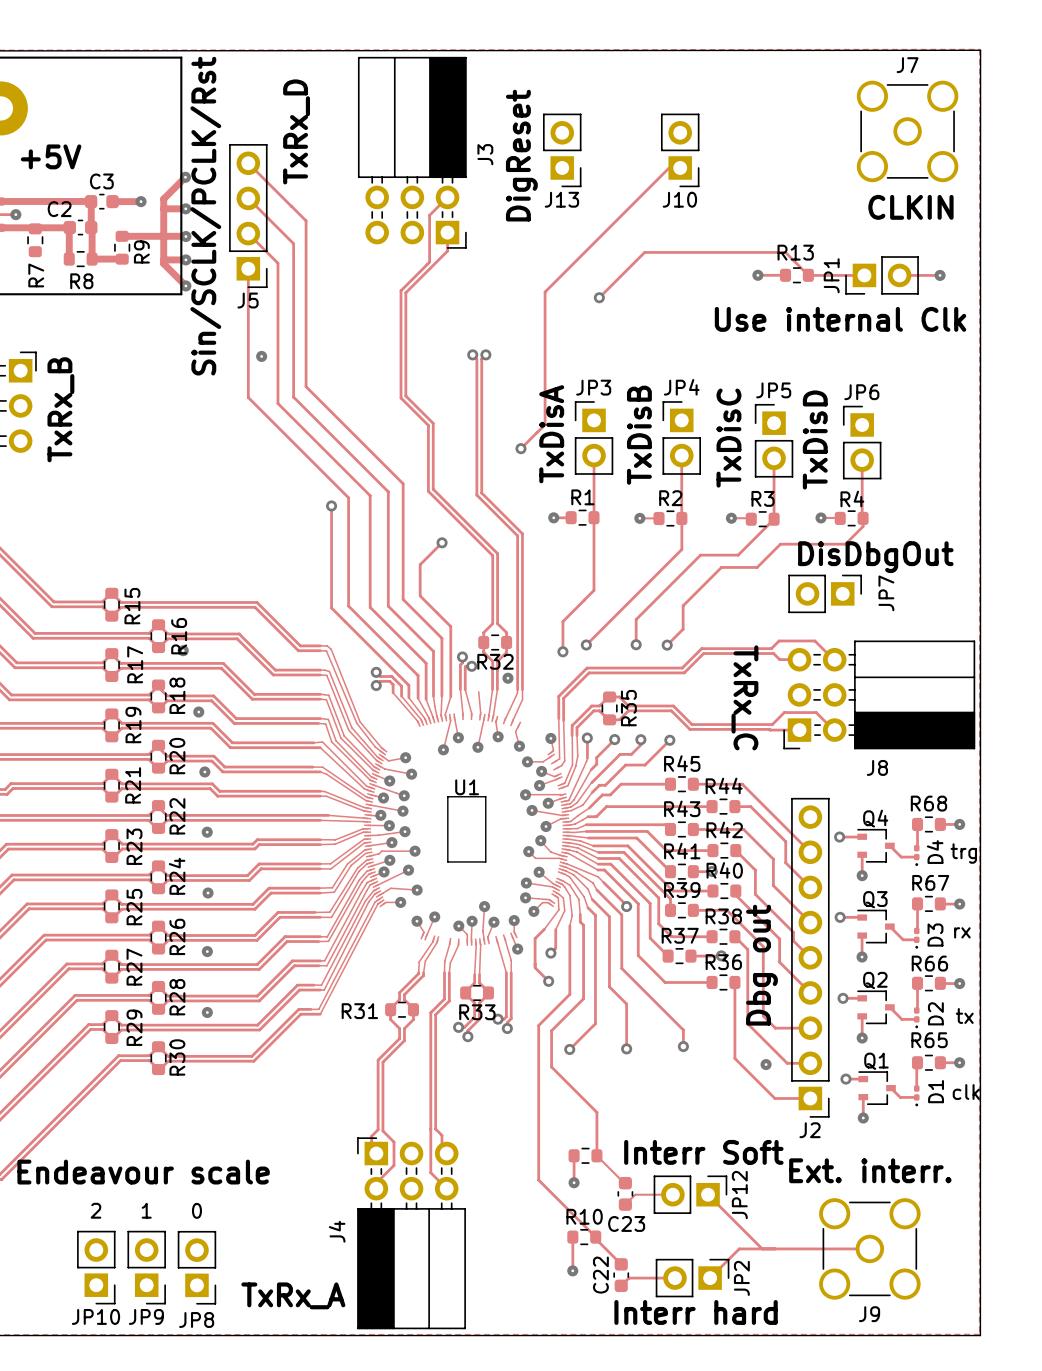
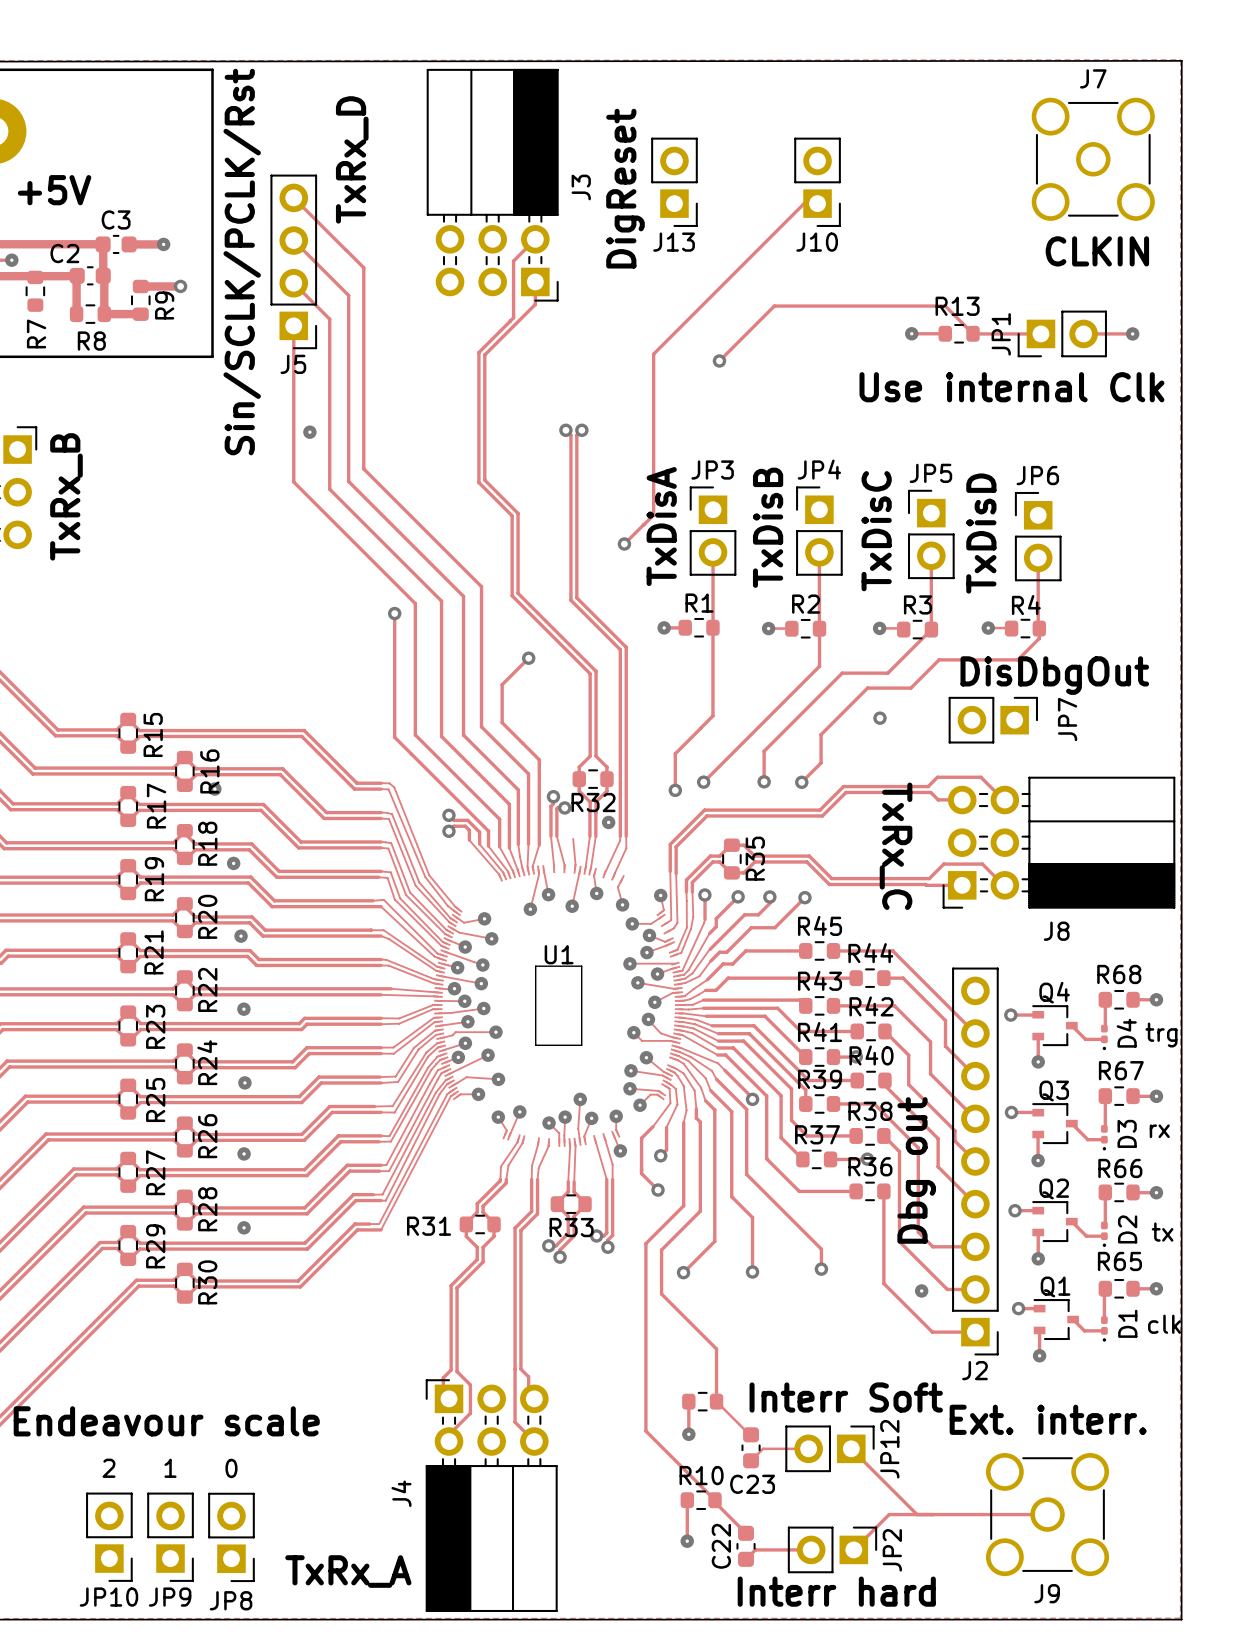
track: (185, 177) (163, 198) (163, 263) (185, 285) -> none
via: (185, 177) -> none
track: (163, 208) (185, 208) -> none
via: (185, 208) -> none
track: (154, 236) (185, 236) -> none
via: none -> (180, 286)
via: (185, 236) -> none
track: (163, 259) (185, 259) -> none
via: (185, 259) -> none
via: (185, 285) -> none
via: none -> (879, 718)

